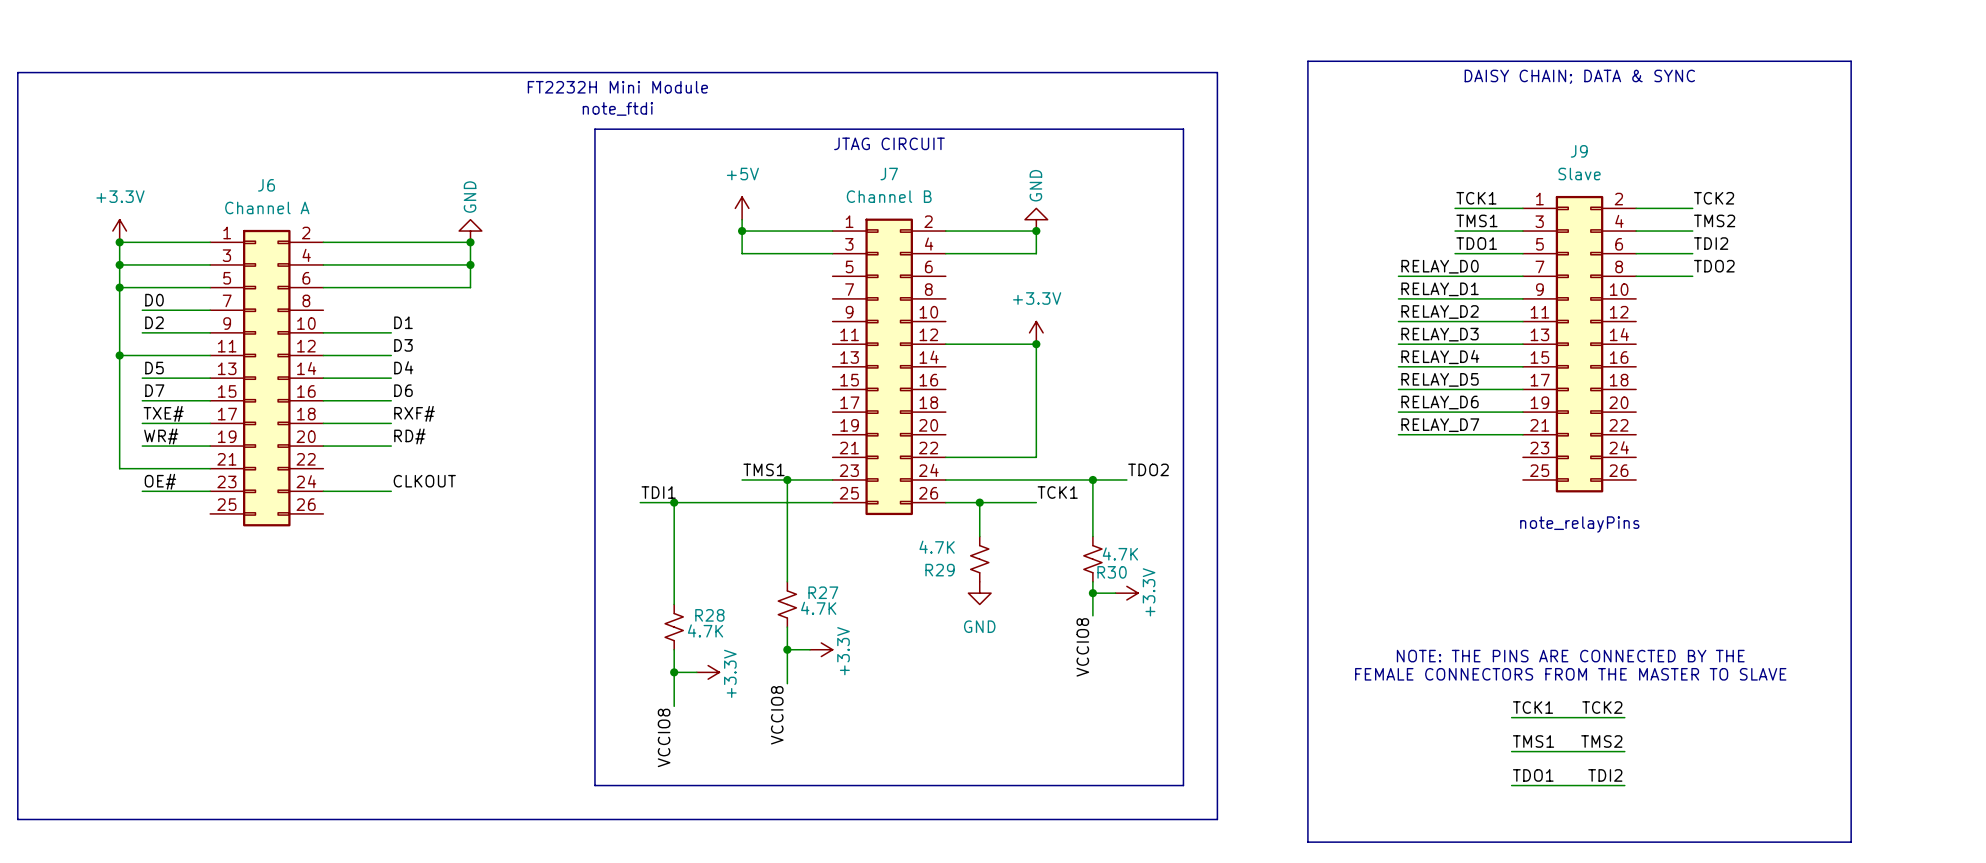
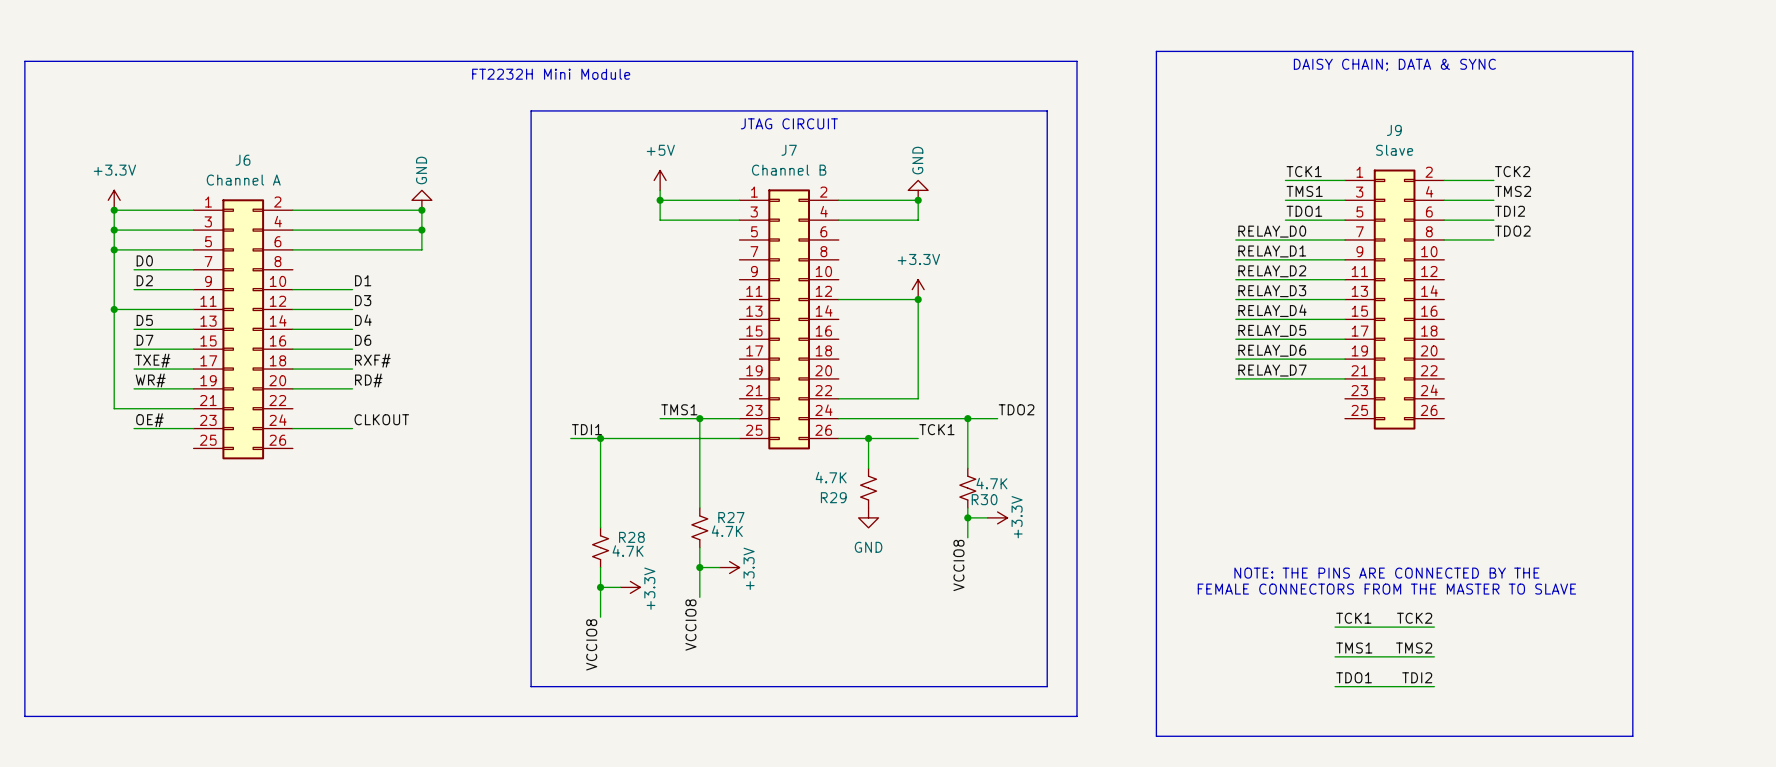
text: note_ftdi (617, 108) -> none
text: note_relayPins (1579, 524) -> none

